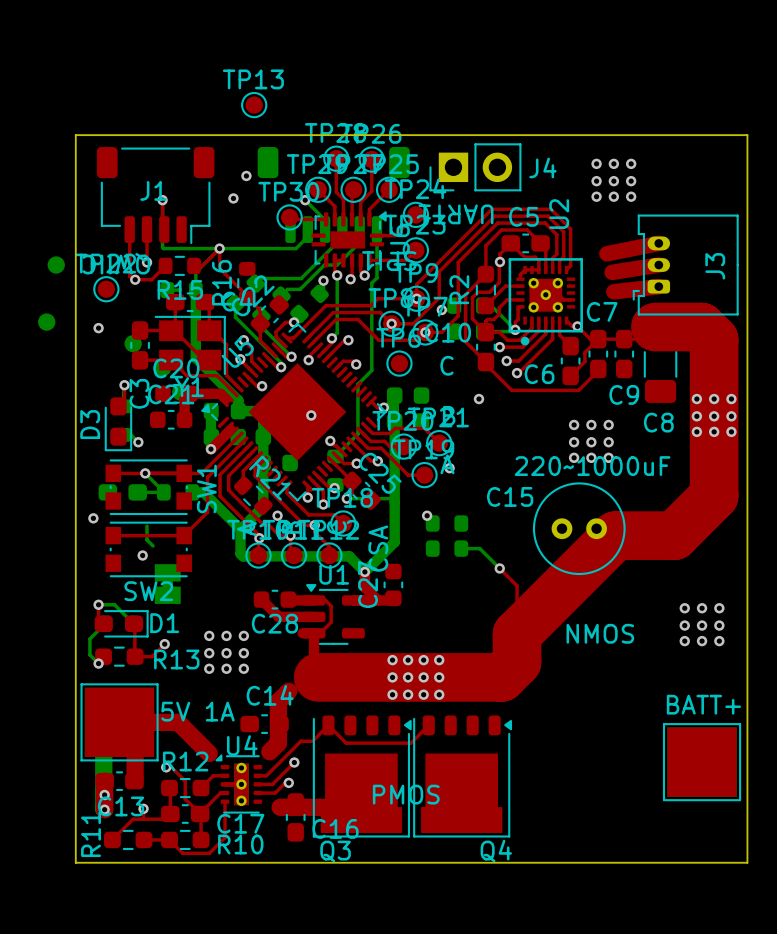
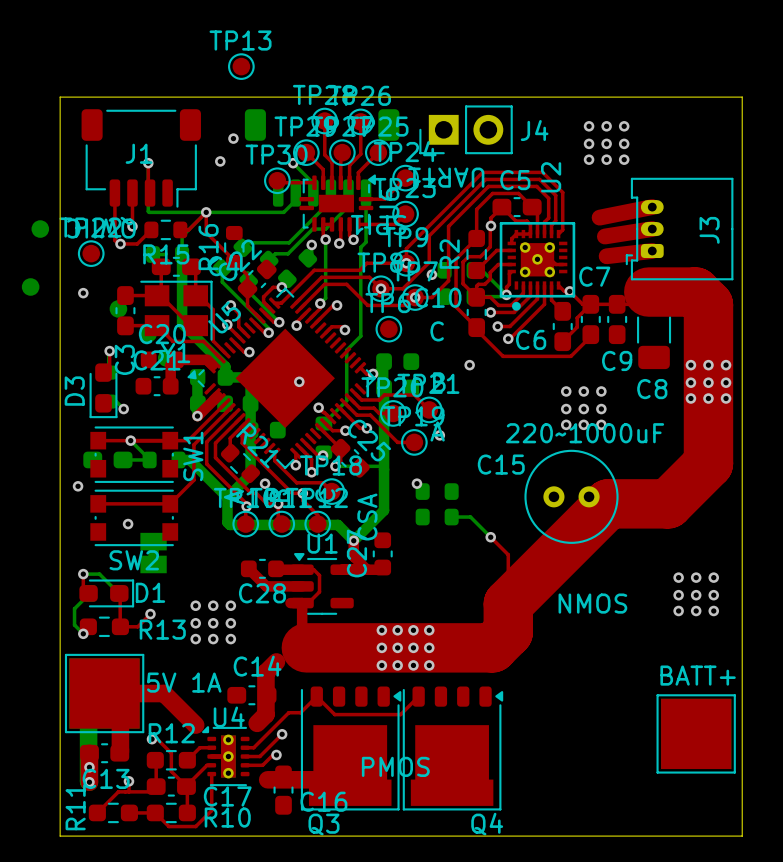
bottom track: (147, 526) (147, 539) (153, 546) -> none

